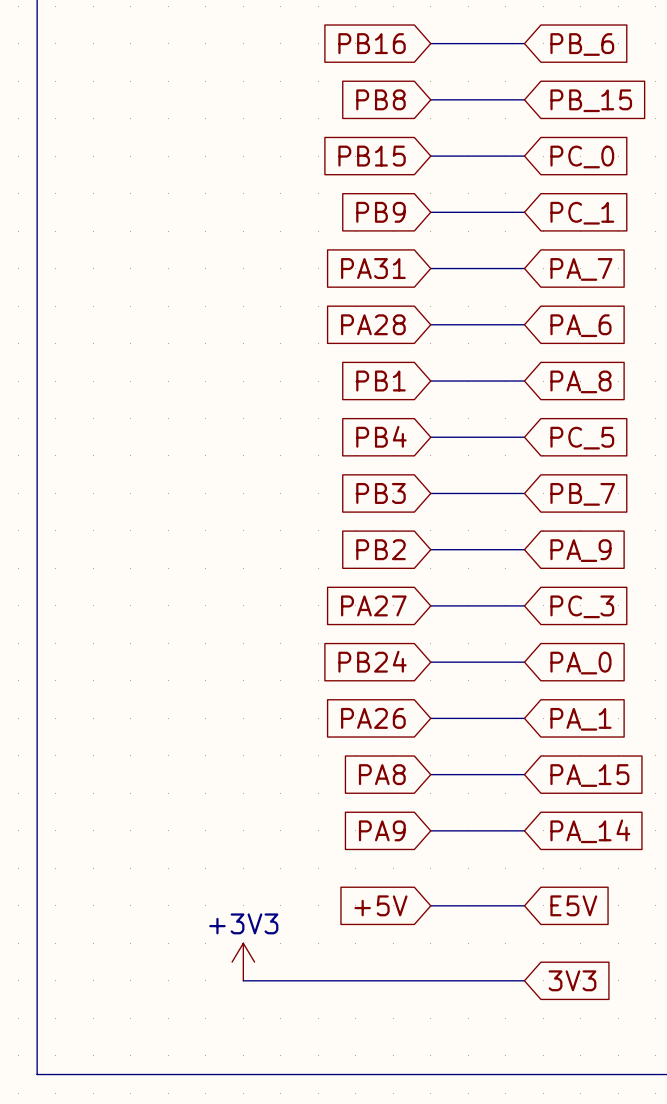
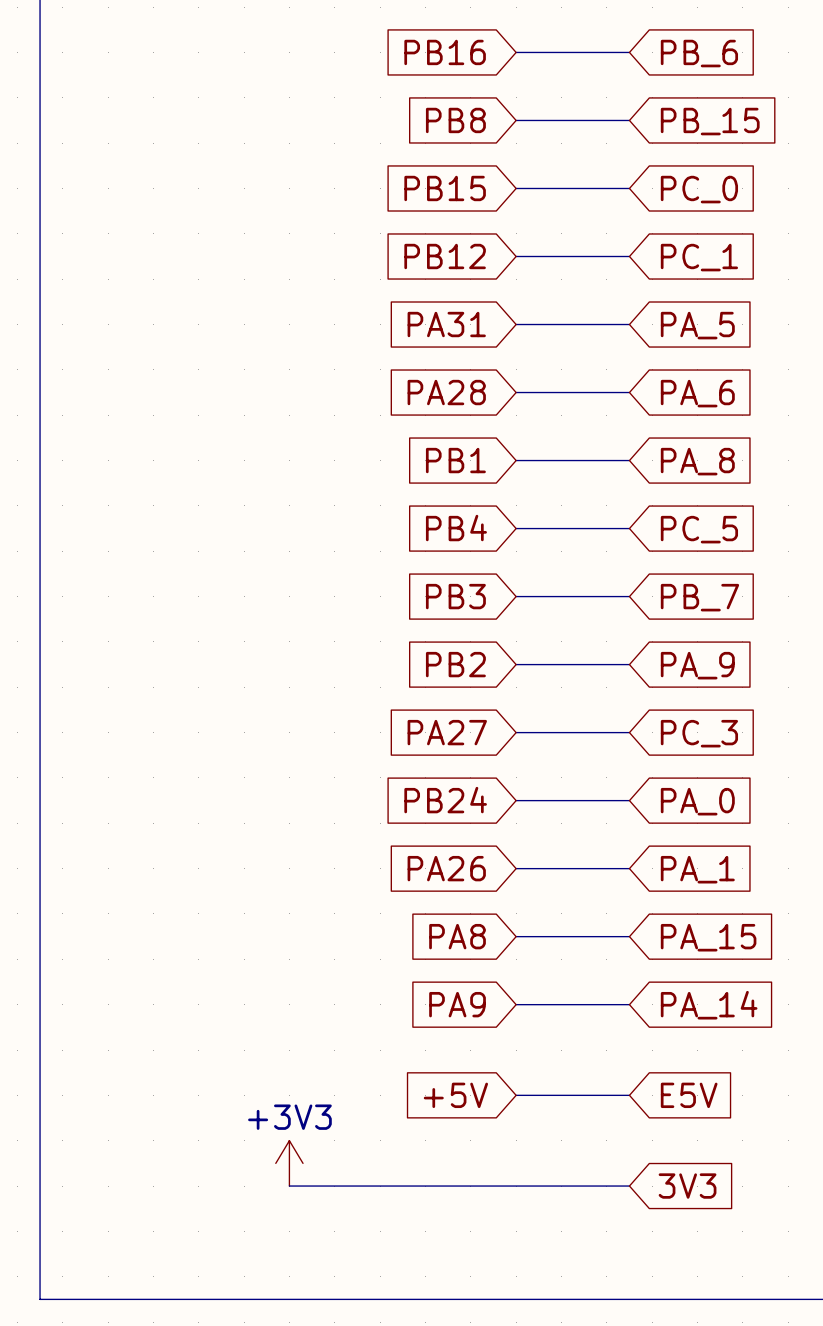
global label: PB9 (380, 212) -> PB12 (445, 256)
global label: PA_7 (581, 269) -> PA_5 (697, 325)

